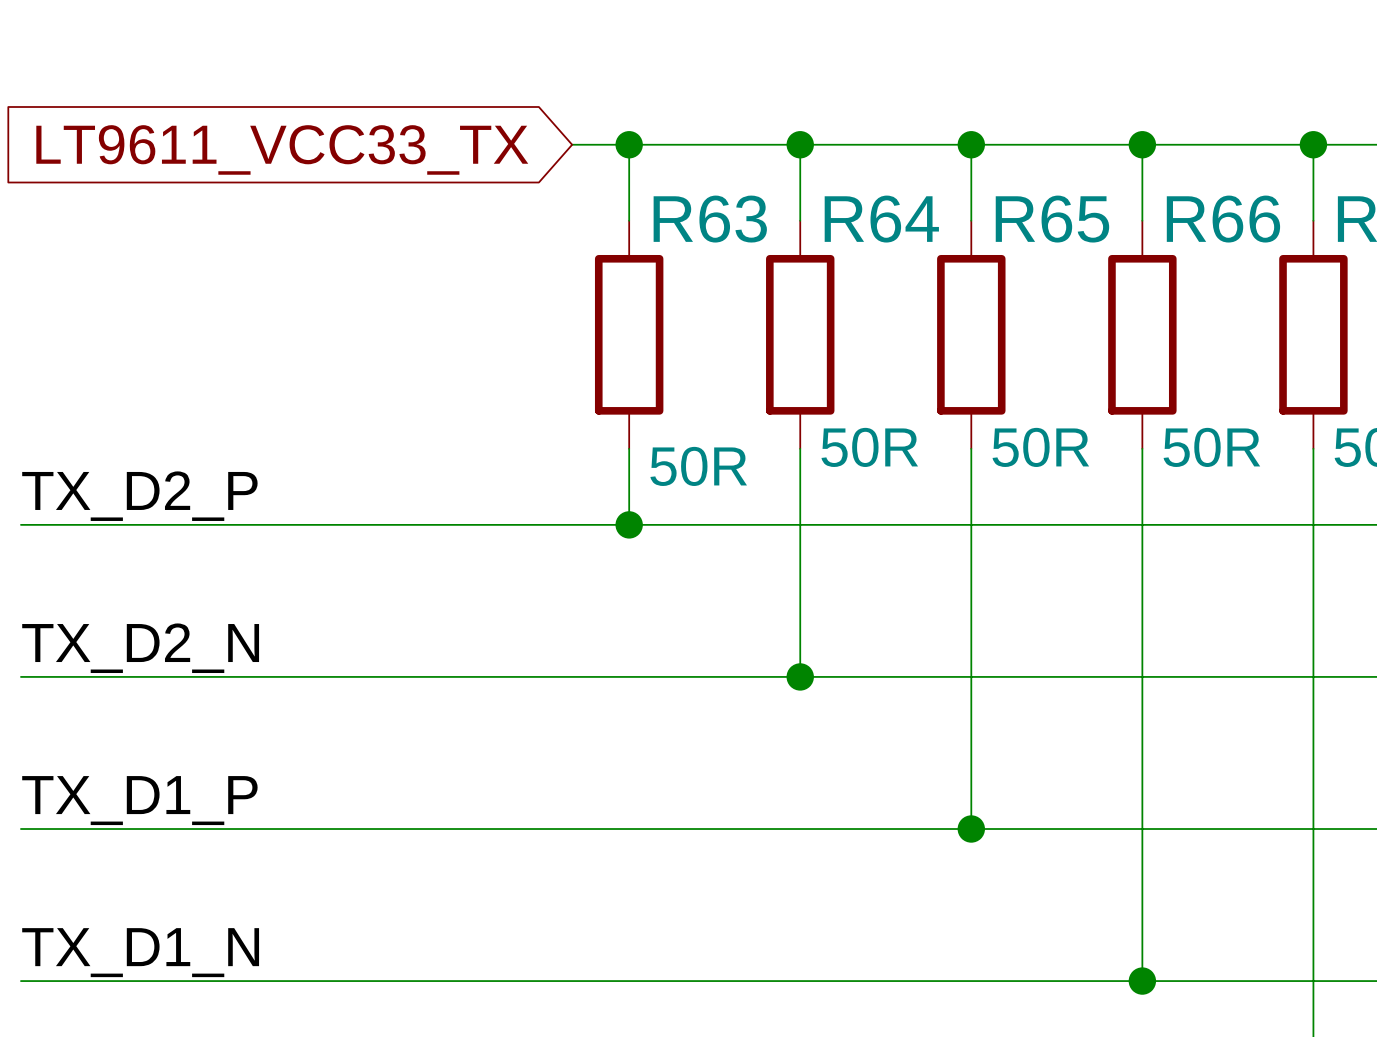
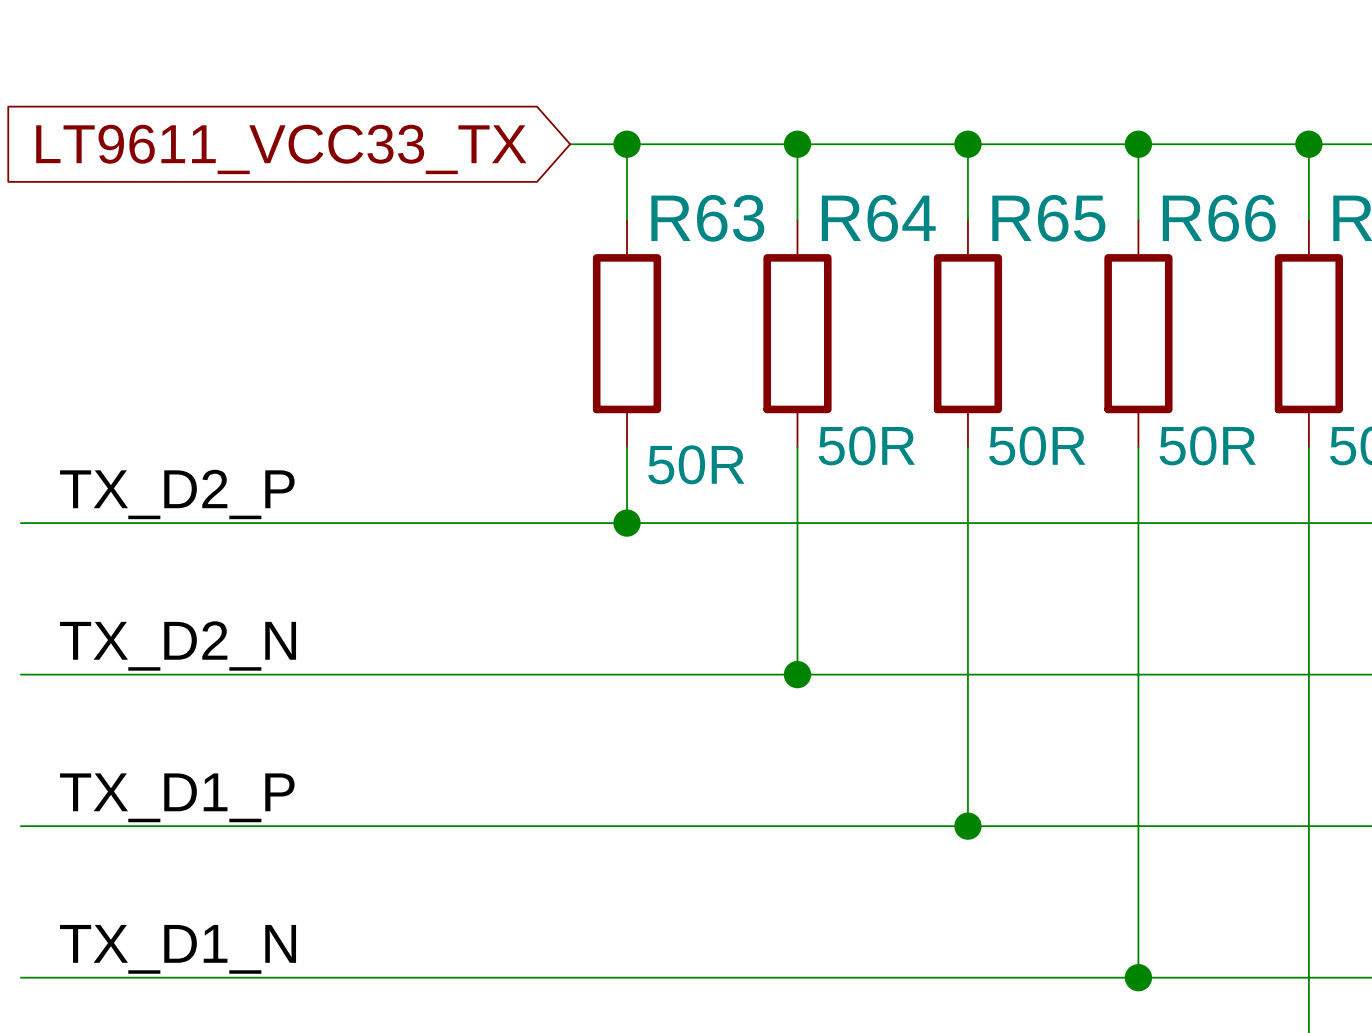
label position: TX_D2_P (139, 496) -> TX_D2_P (177, 494)
label position: TX_D2_N (140, 648) -> TX_D2_N (178, 645)
label position: TX_D1_P (139, 800) -> TX_D1_P (177, 797)
label position: TX_D1_N (140, 952) -> TX_D1_N (178, 949)

